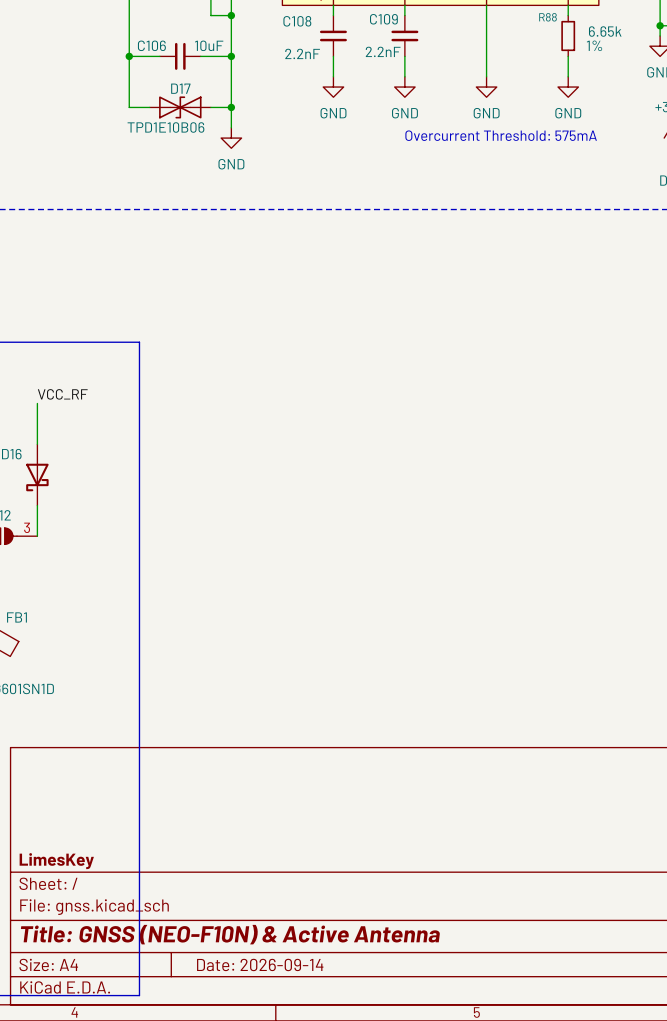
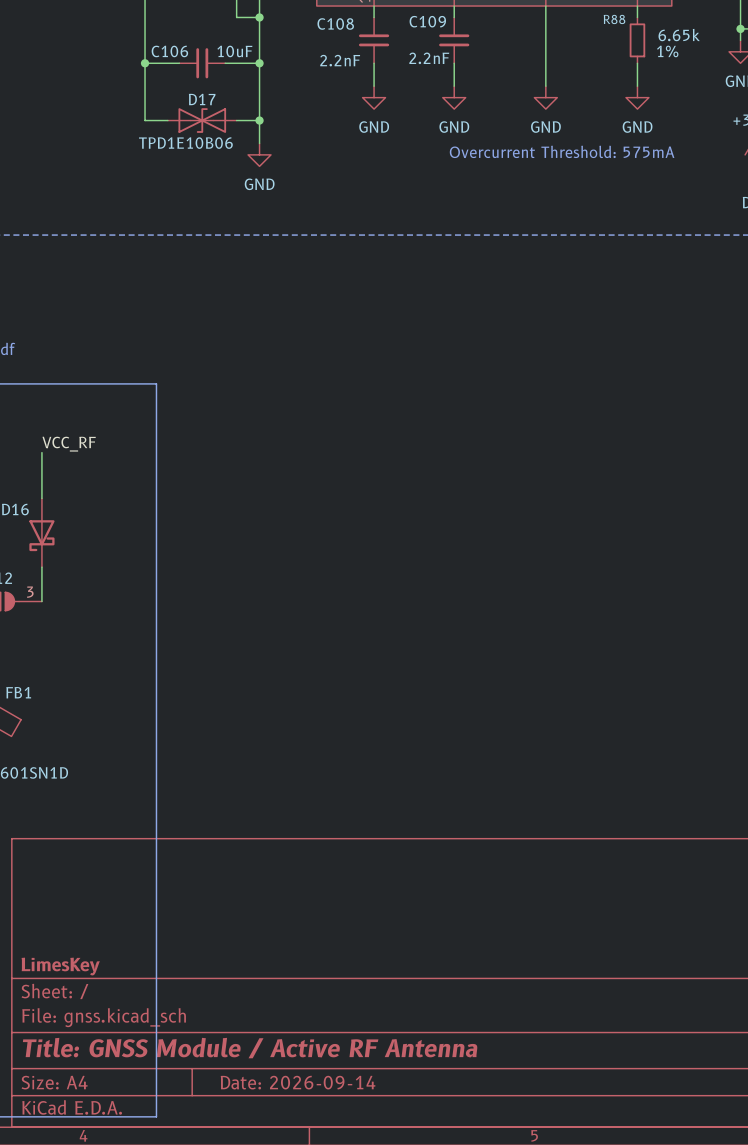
title block: Title: GNSS (NEO-F10N) & Active Antenna (230, 934) -> Title: GNSS Module / Active RF Antenna (250, 1048)

